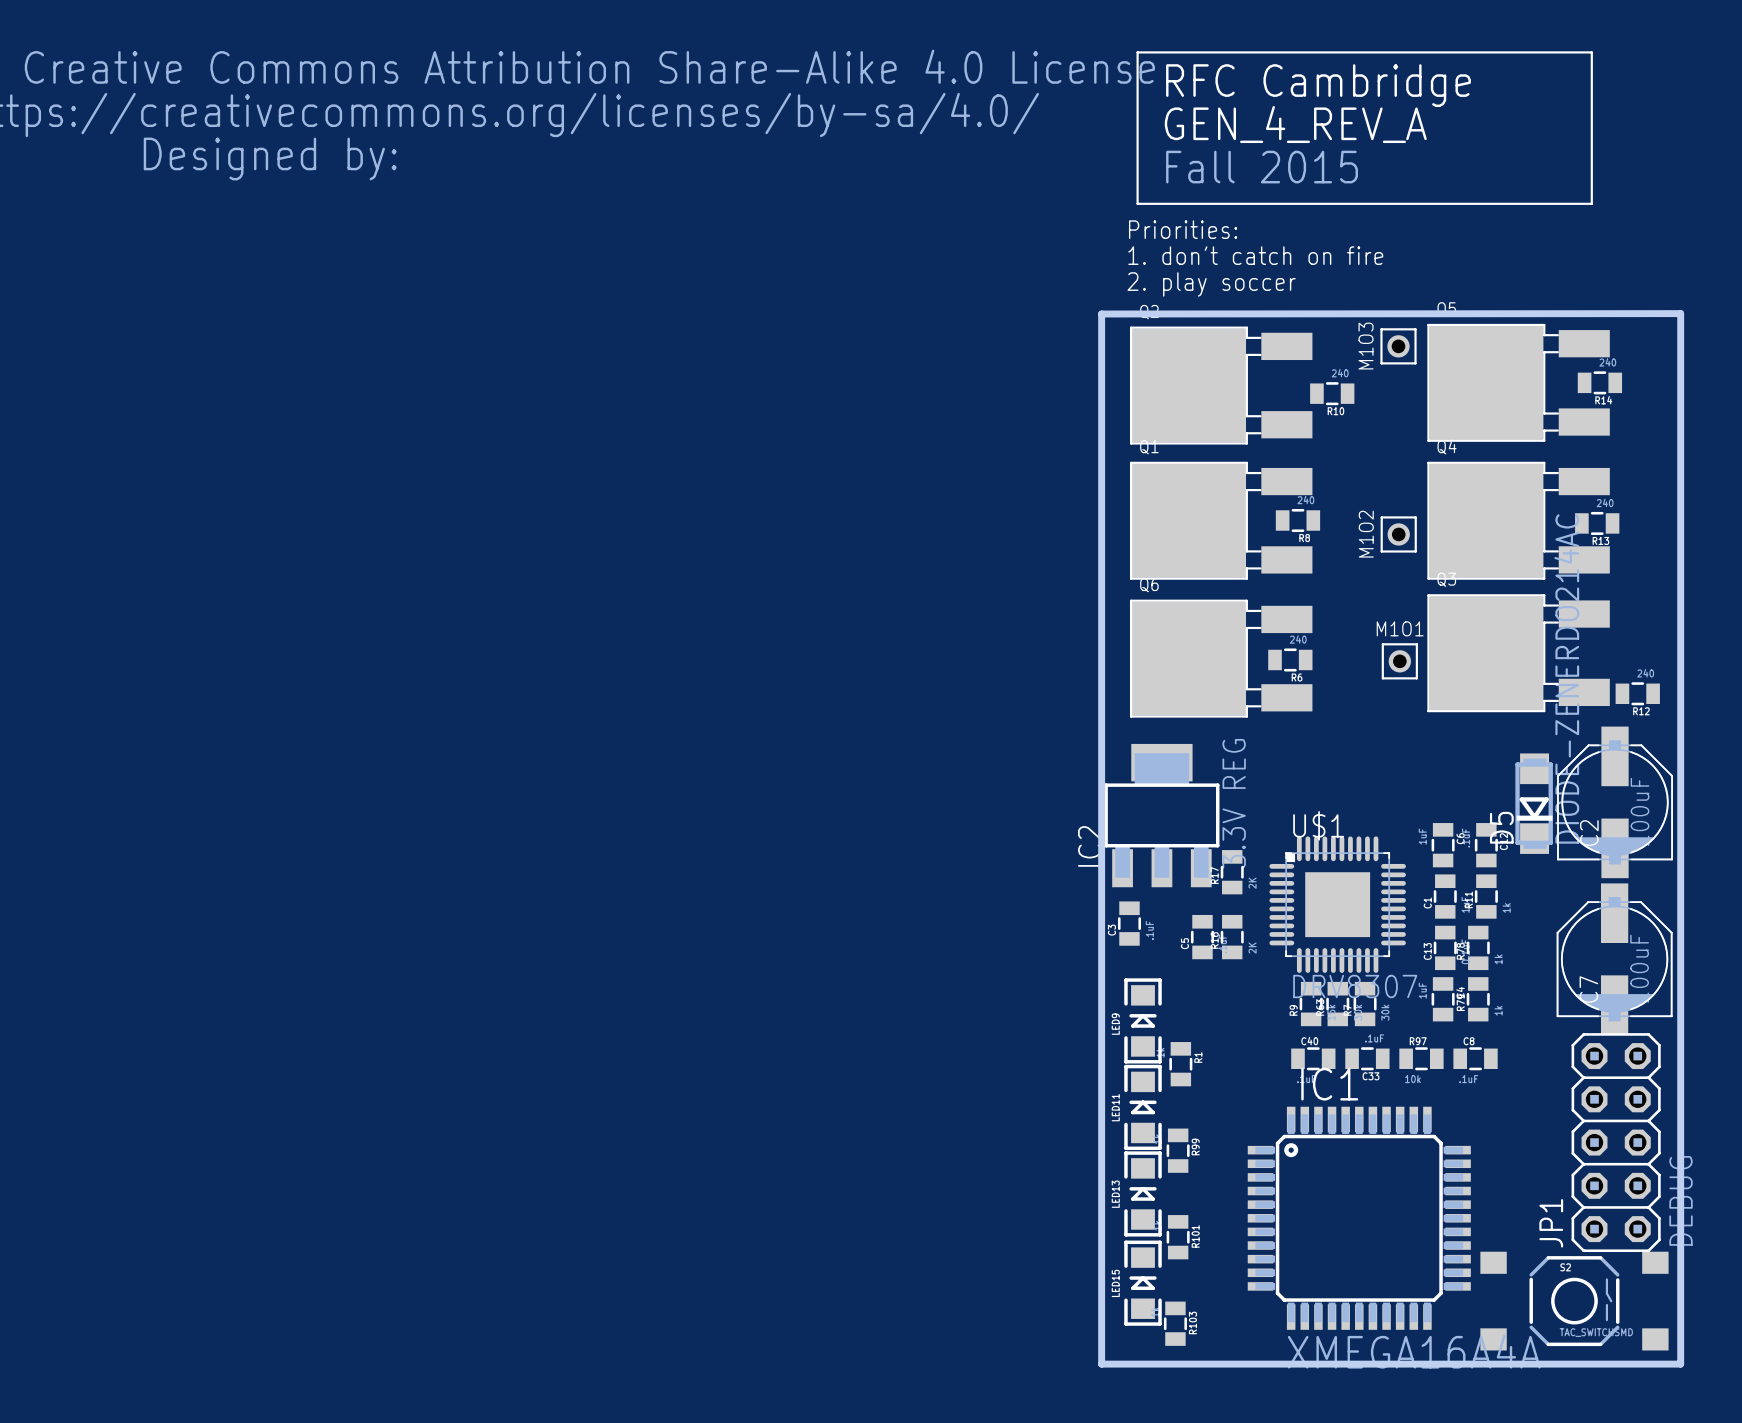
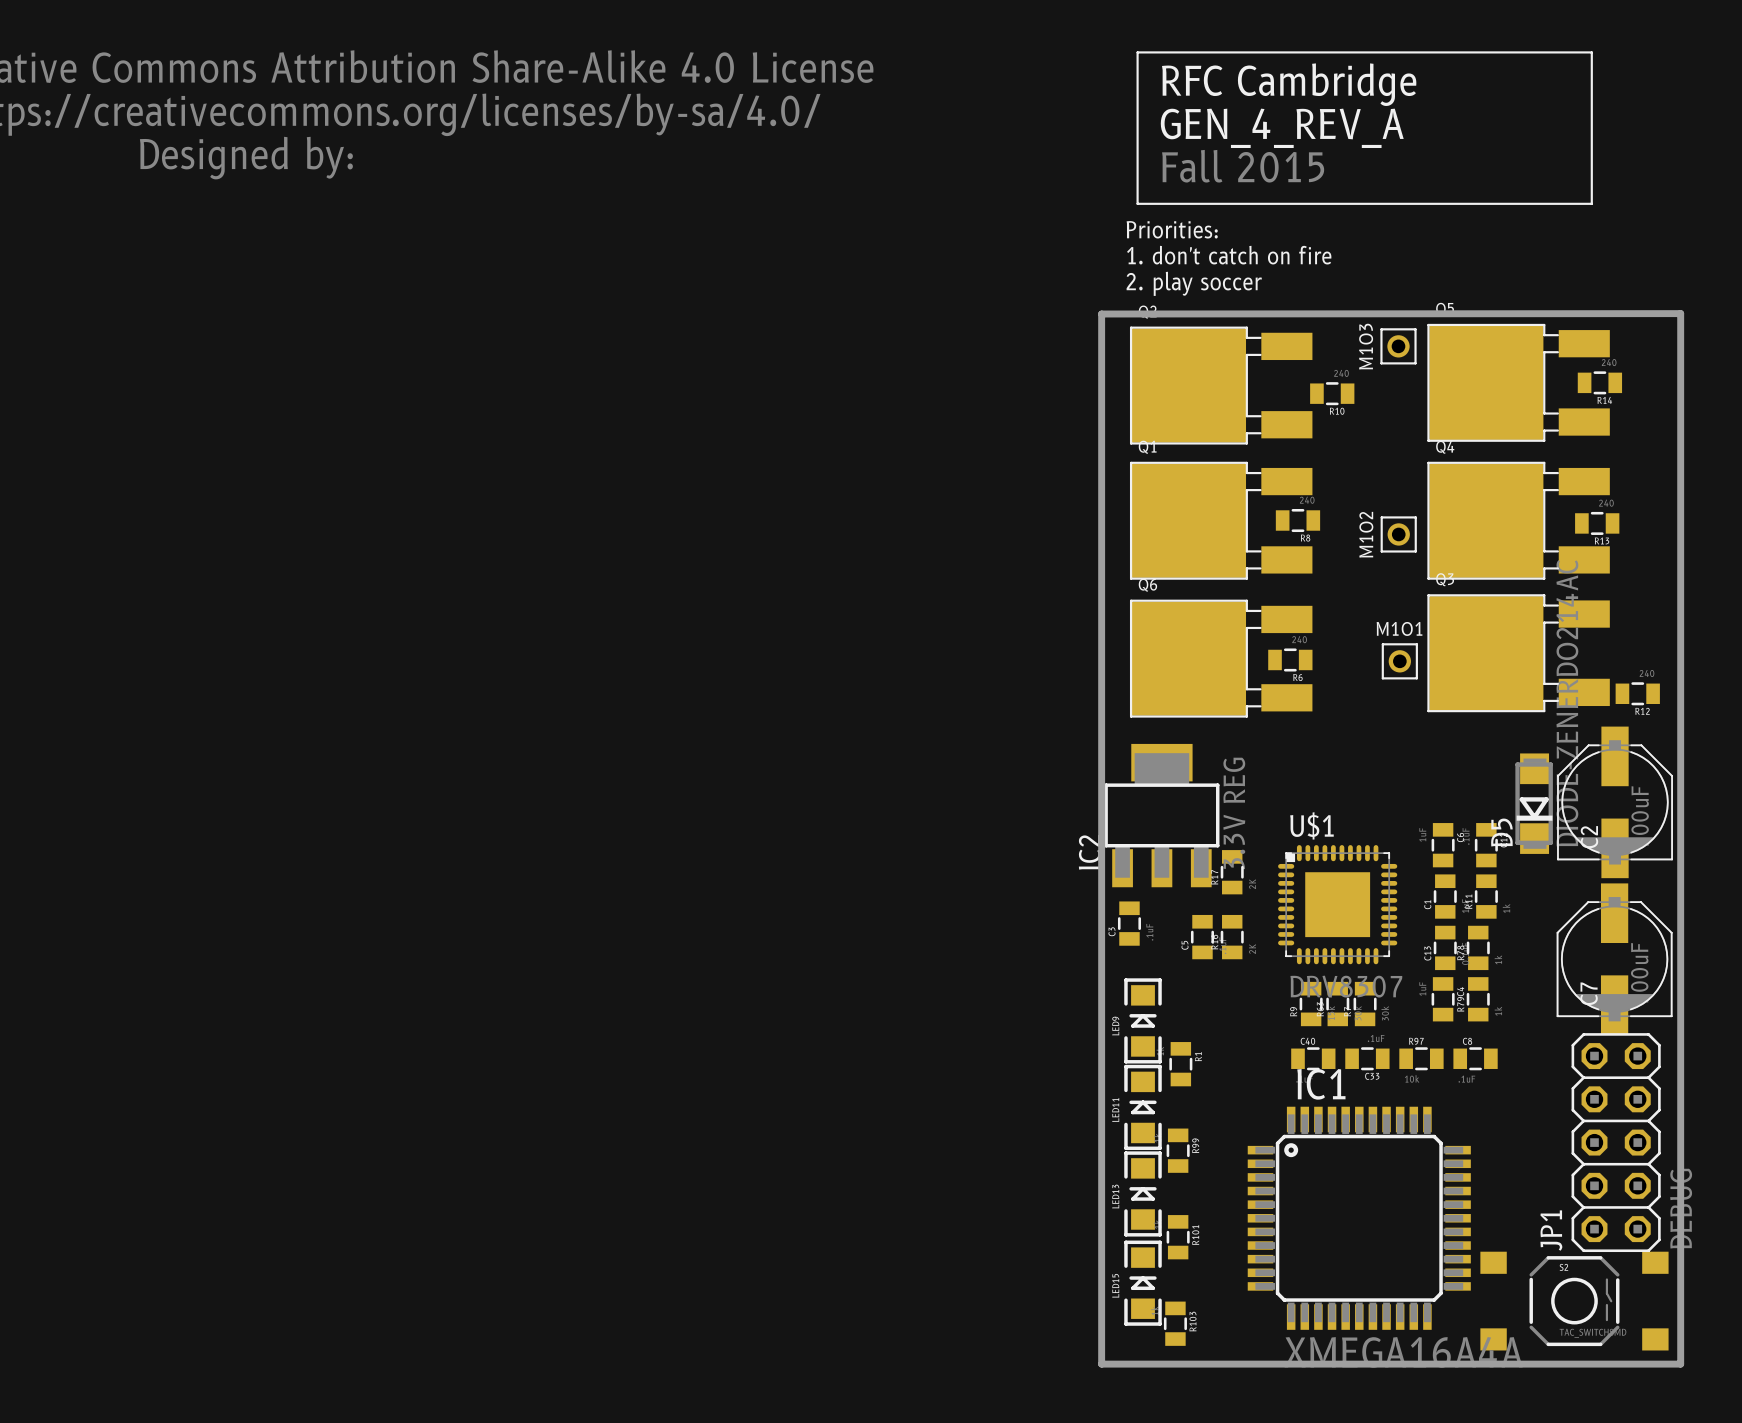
U$1 footprint: [1269, 836, 1406, 973] -> [1278, 845, 1398, 965]

